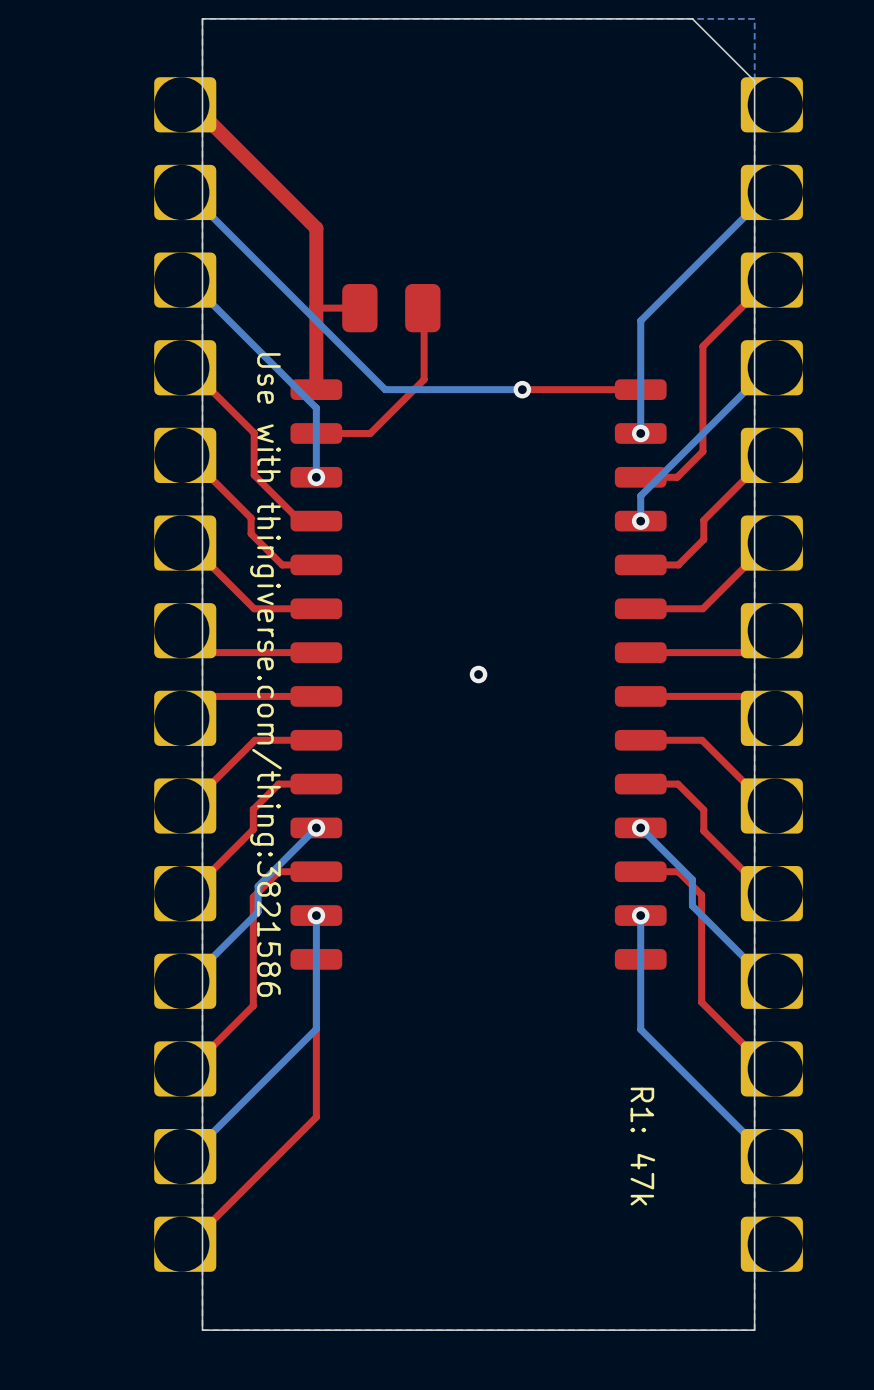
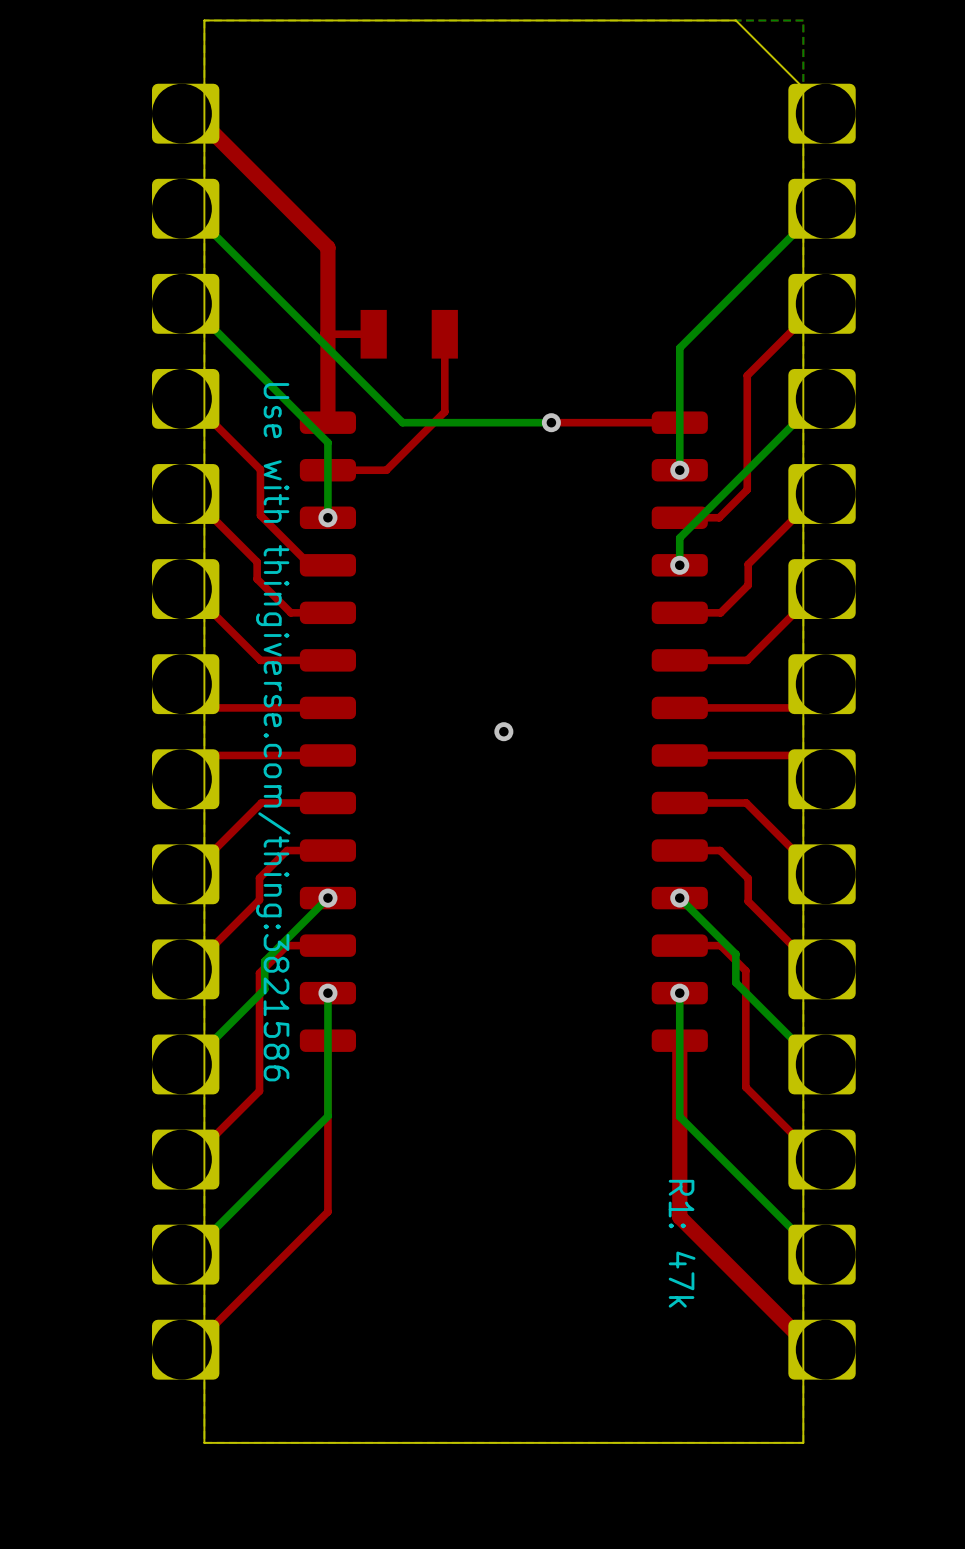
part footprint: [342, 283, 441, 333] -> [360, 309, 458, 359]
top track: none -> (679, 1040) (679, 1217) (812, 1349) (822, 1349)

